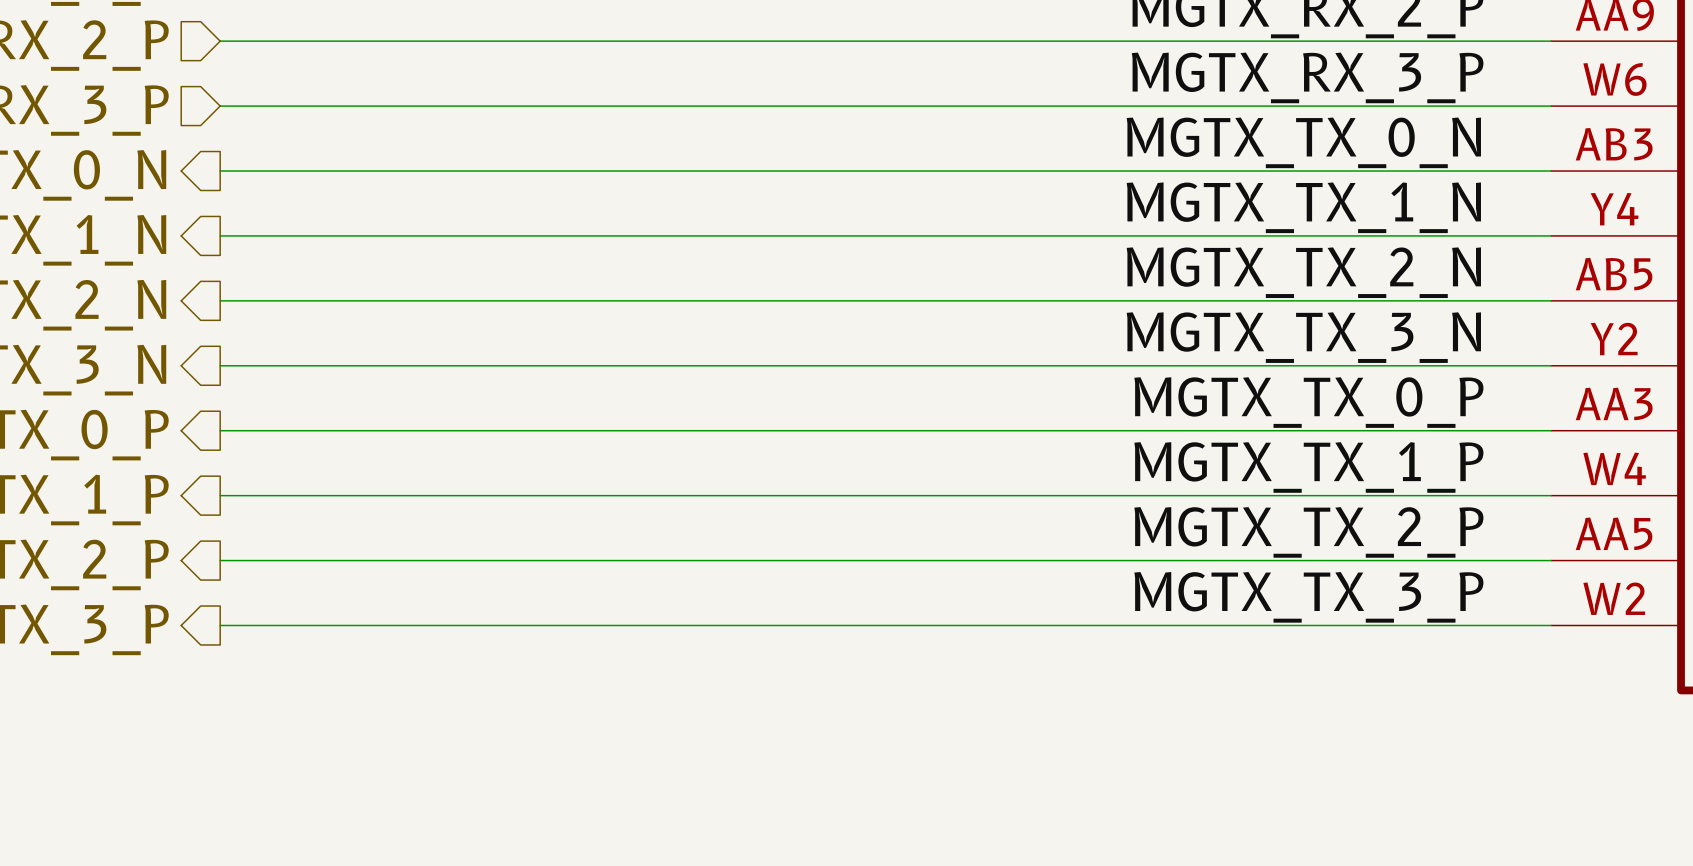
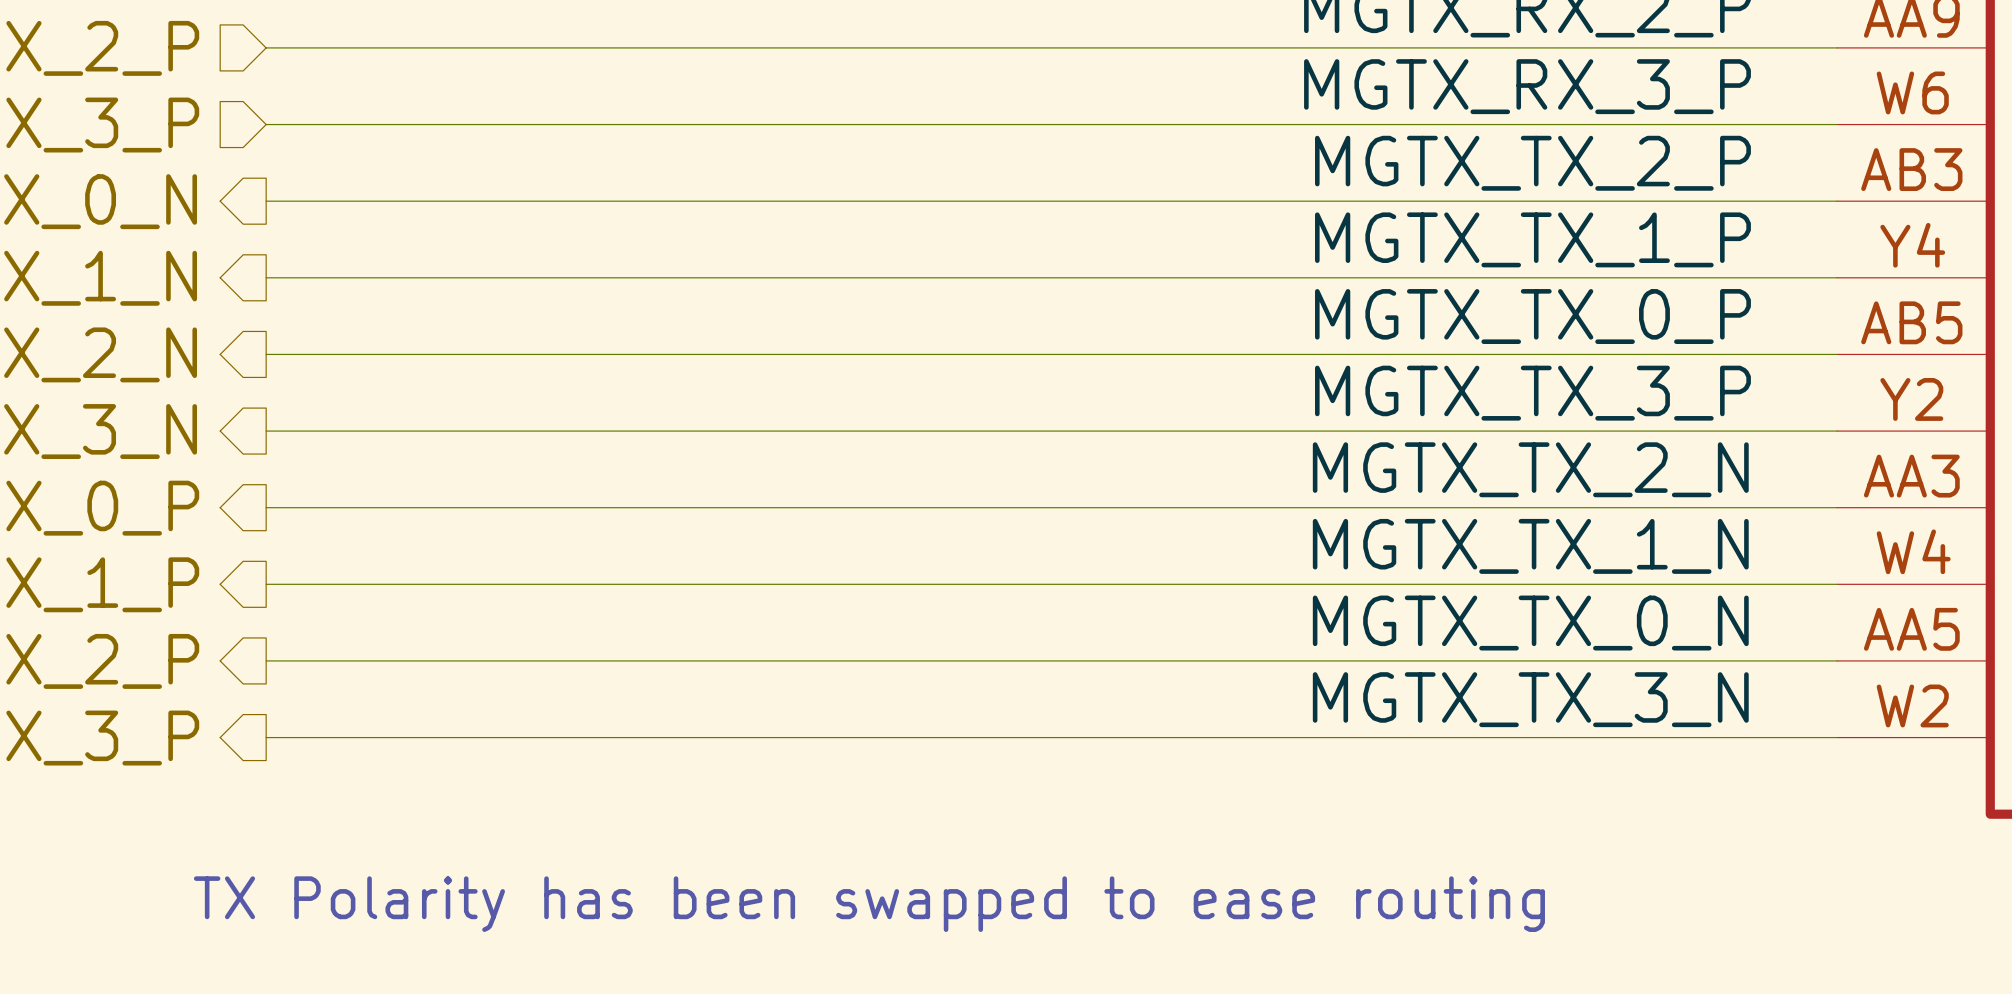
label: MGTX_TX_0_N (1303, 142) -> MGTX_TX_2_P (1532, 163)
label: MGTX_TX_1_N (1303, 207) -> MGTX_TX_1_P (1532, 239)
label: MGTX_TX_2_N (1303, 272) -> MGTX_TX_0_P (1532, 316)
label: MGTX_TX_3_N (1303, 337) -> MGTX_TX_3_P (1532, 393)
label: MGTX_TX_0_P (1308, 402) -> MGTX_TX_2_N (1530, 469)
label: MGTX_TX_1_P (1308, 467) -> MGTX_TX_1_N (1530, 546)
label: MGTX_TX_2_P (1308, 532) -> MGTX_TX_0_N (1530, 623)
label: MGTX_TX_3_P (1308, 597) -> MGTX_TX_3_N (1530, 699)
text: none -> TX Polarity has been swapped to ease routing (869, 904)

